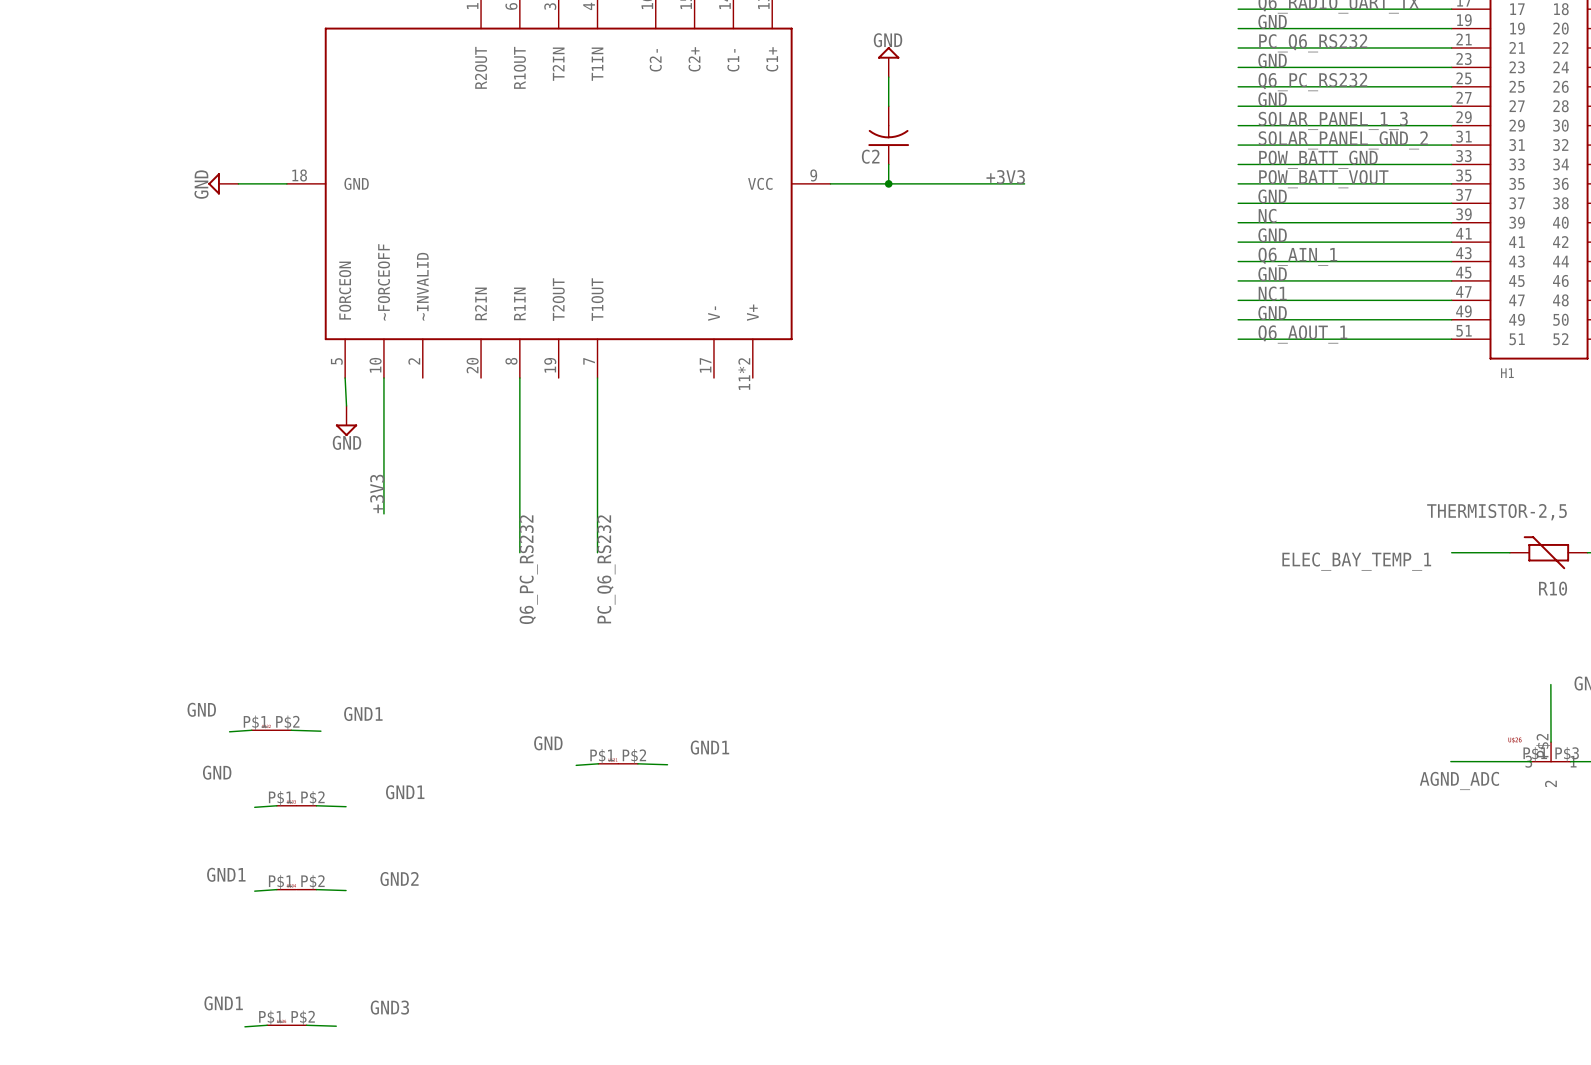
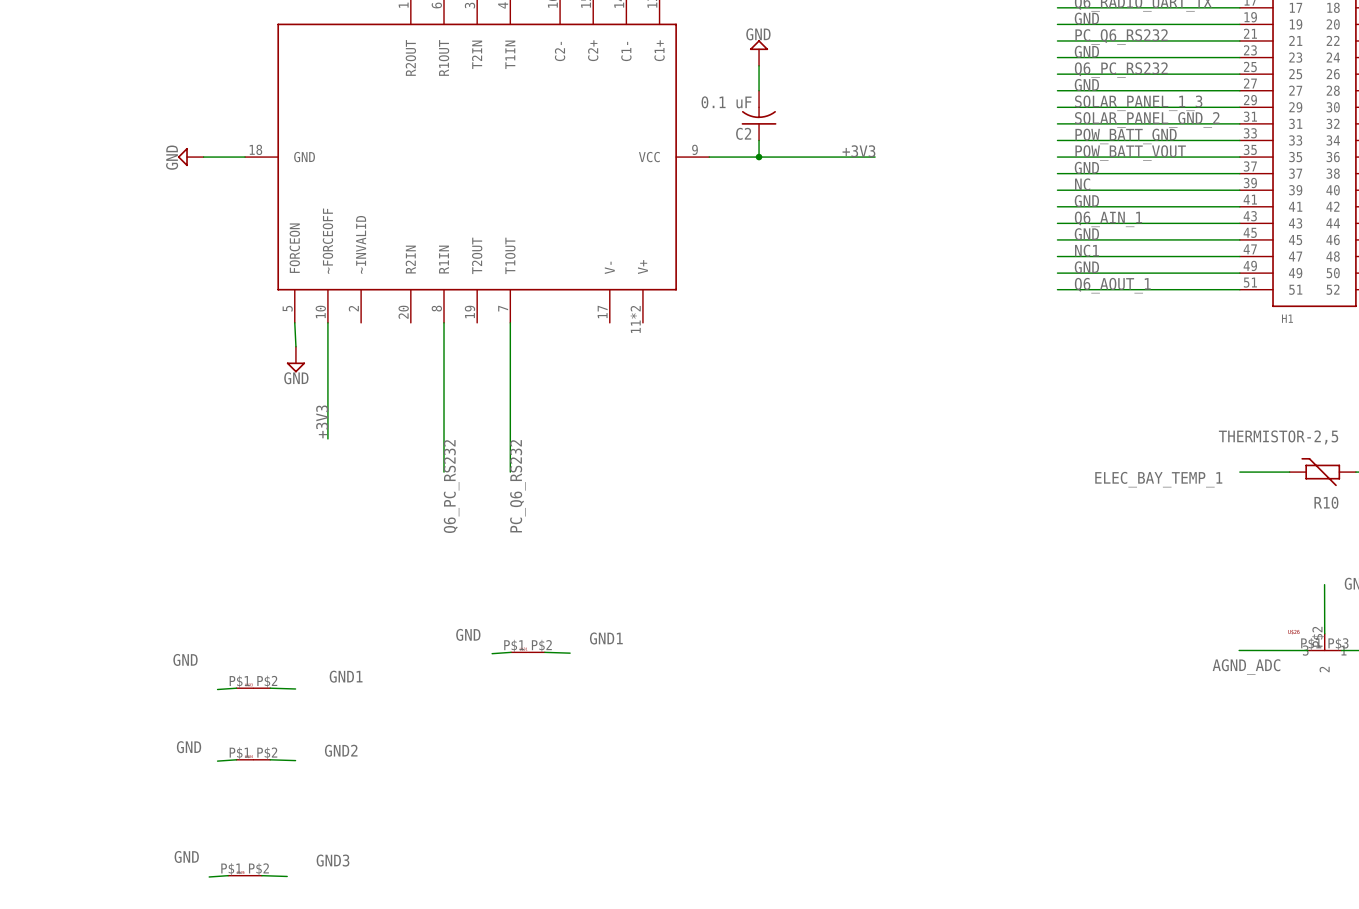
C2 value: none -> 0.1 uF (726, 102)
label: GND (201, 709) -> none
label: GND1 (363, 714) -> none
wire: (251, 730) (229, 731) -> none
part: (271, 730) -> none
wire: (291, 730) (320, 731) -> none
label: GND1 (226, 874) -> GND (189, 747)
label: GND1 (223, 1003) -> GND (186, 856)

